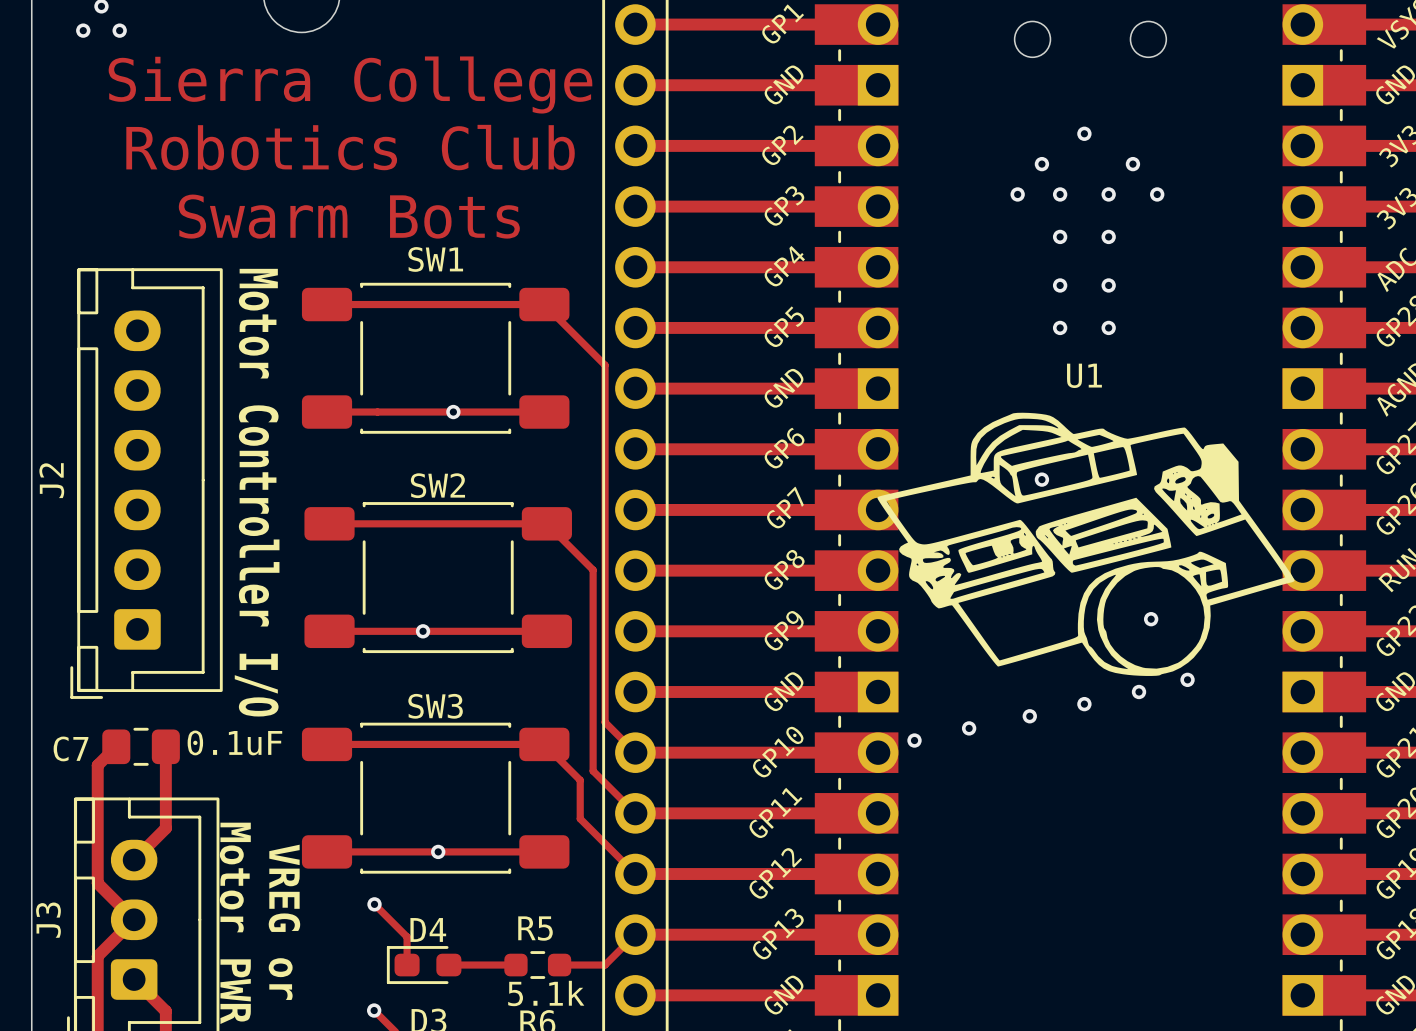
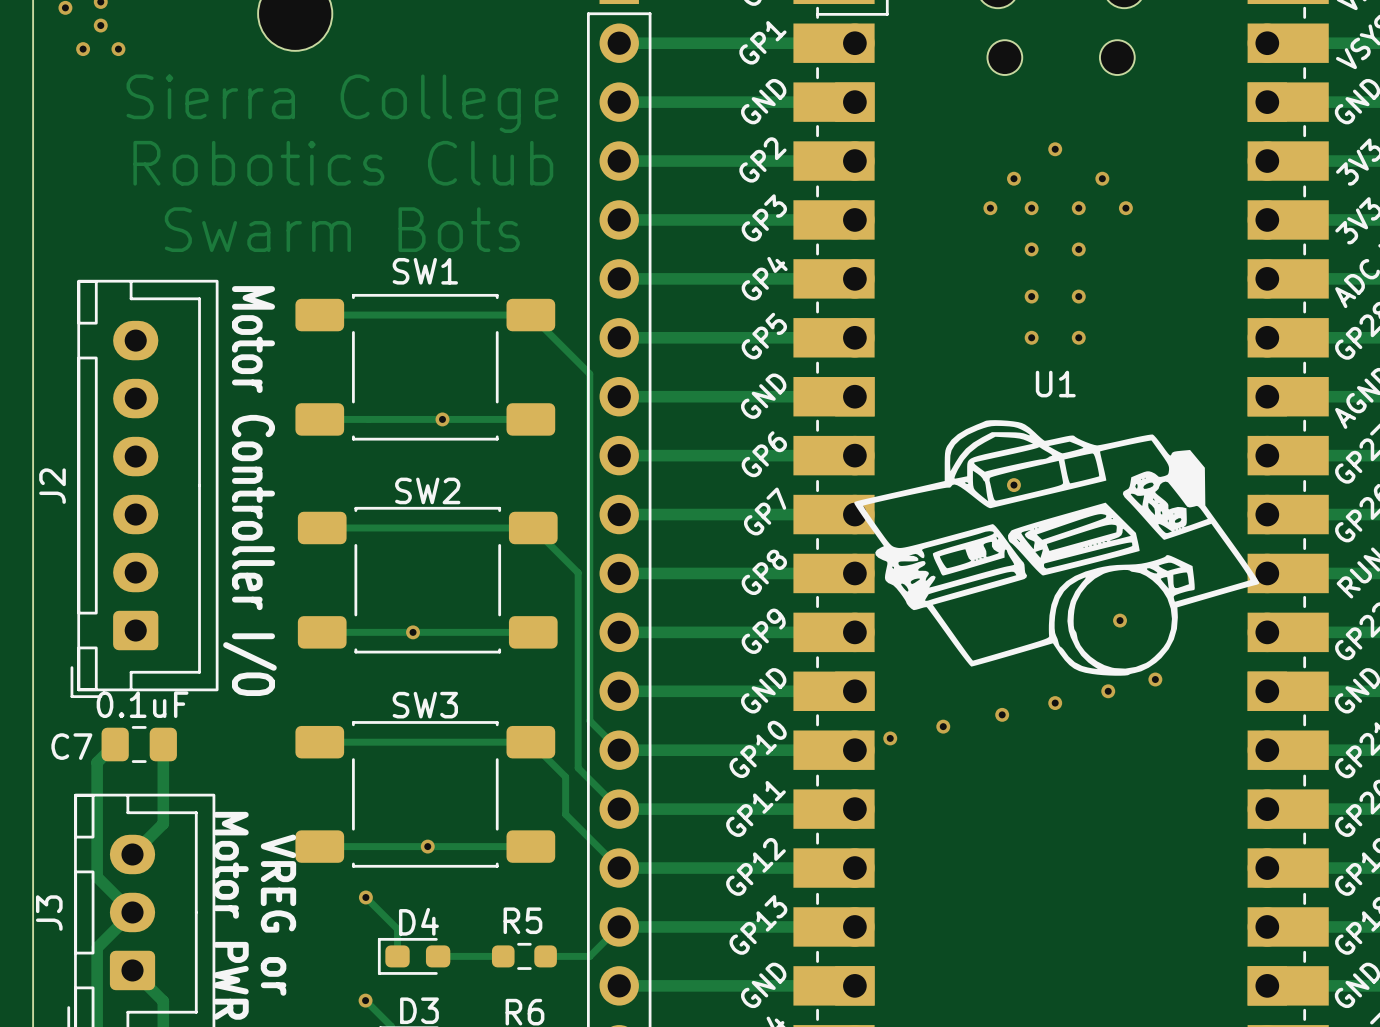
C7 value position: 0.1uF (234, 742) -> 0.1uF (142, 704)
R5 value: 5.1k (546, 993) -> none

